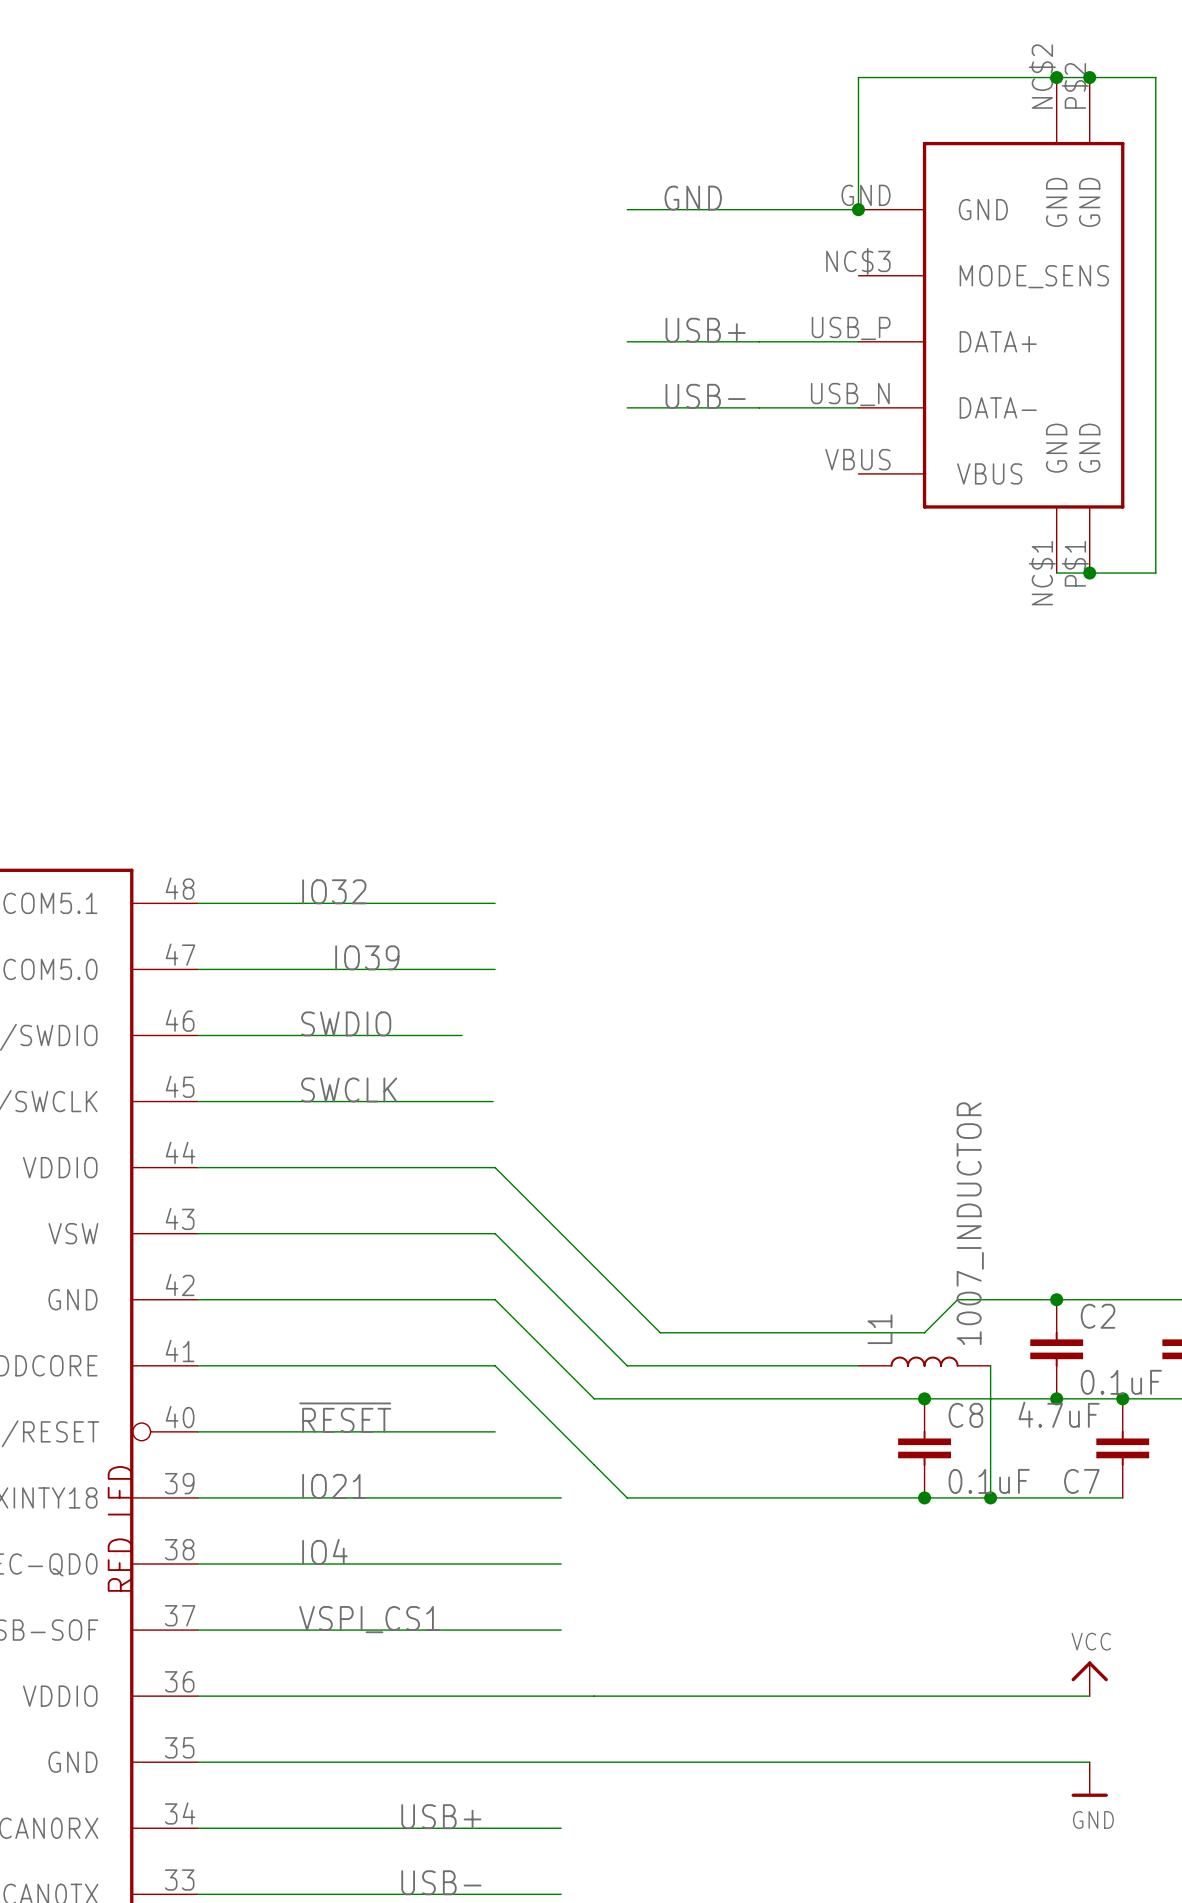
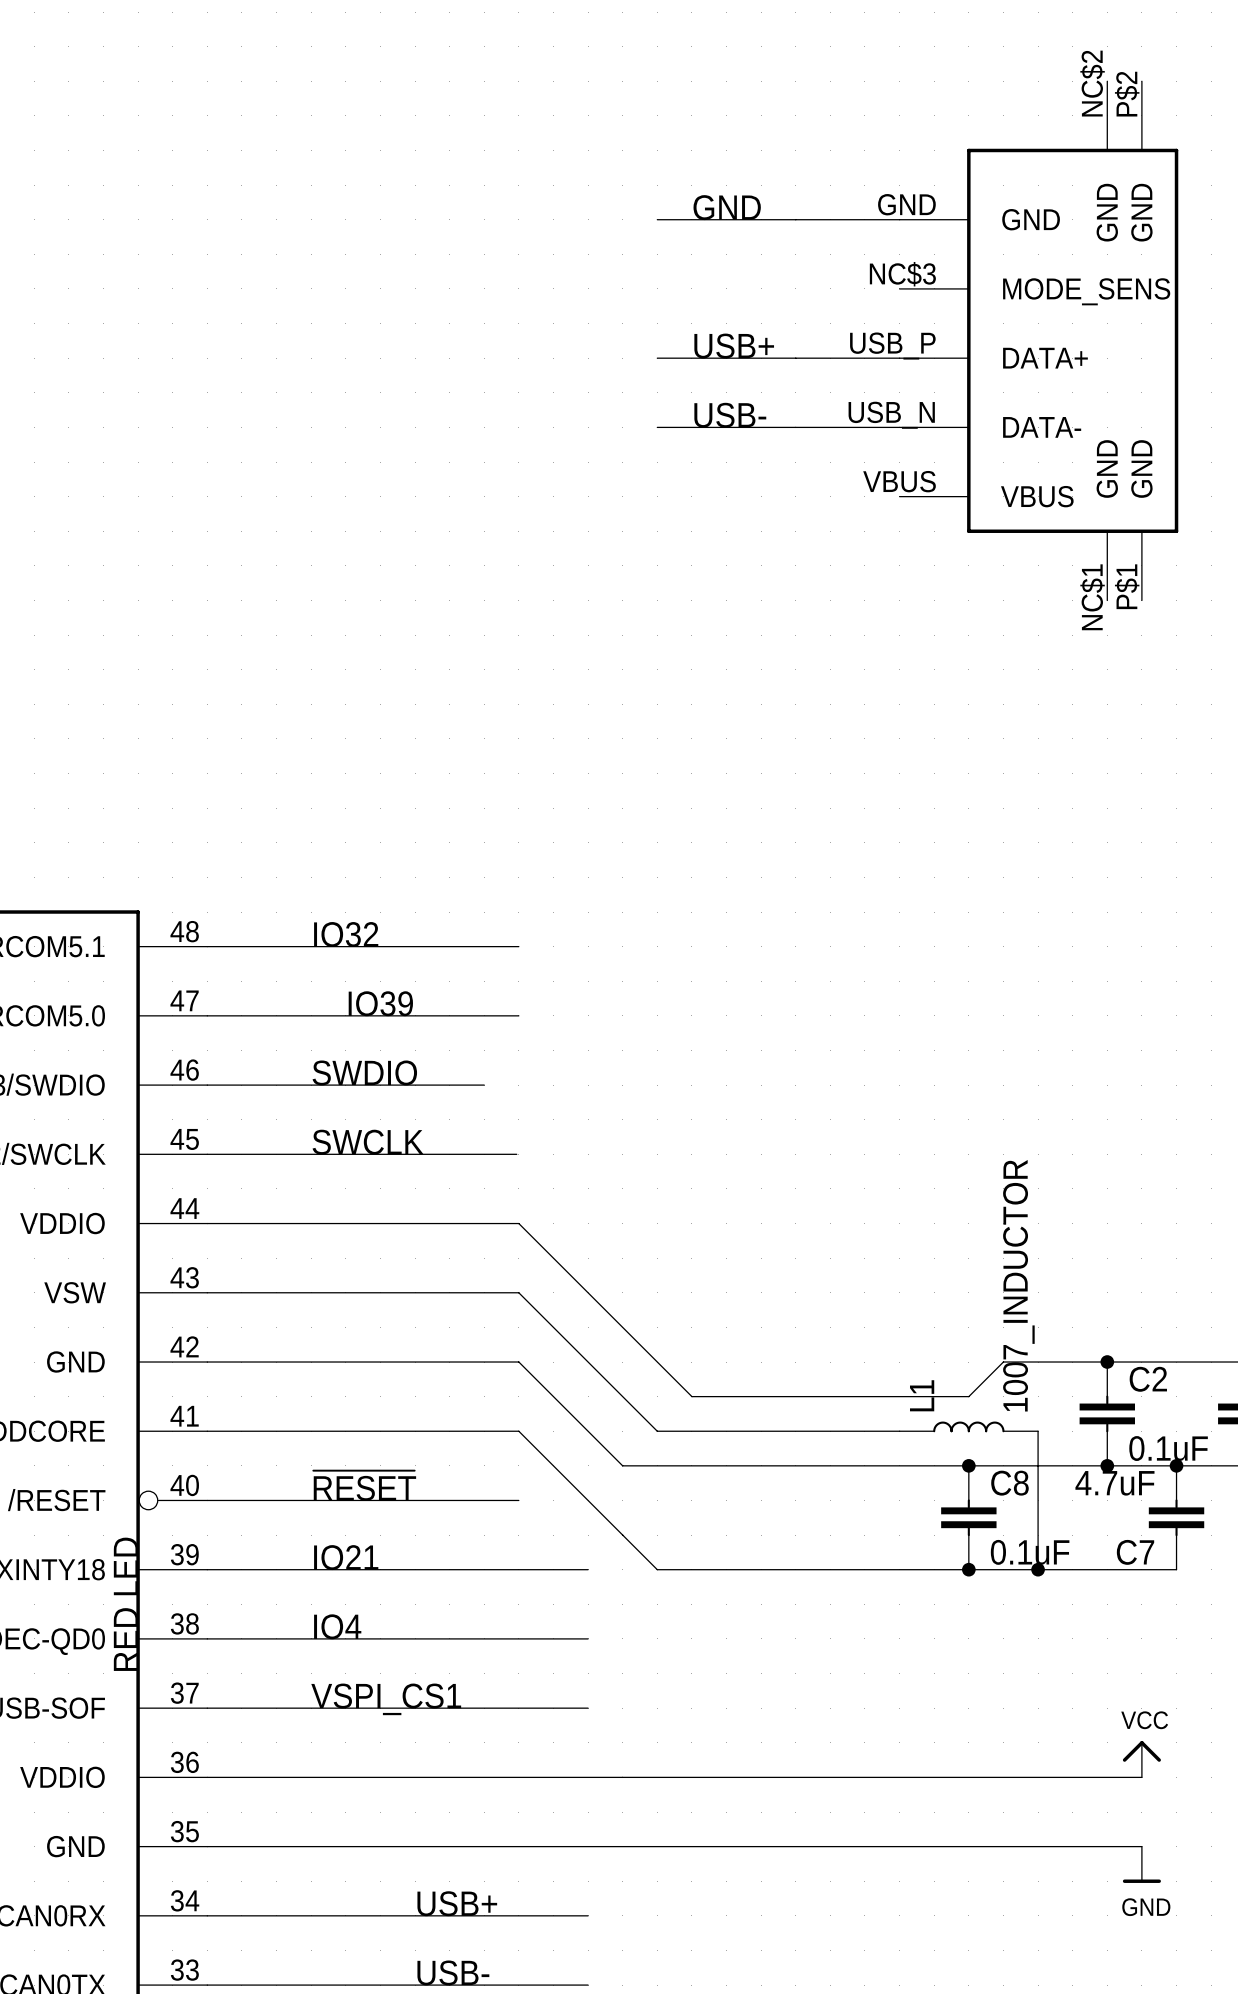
junction: (1056, 77) -> none
junction: (1089, 77) -> none
wire: (858, 209) (858, 77) (1155, 77) (1155, 573) (1056, 573) -> none
junction: (858, 209) -> none
junction: (1089, 573) -> none

